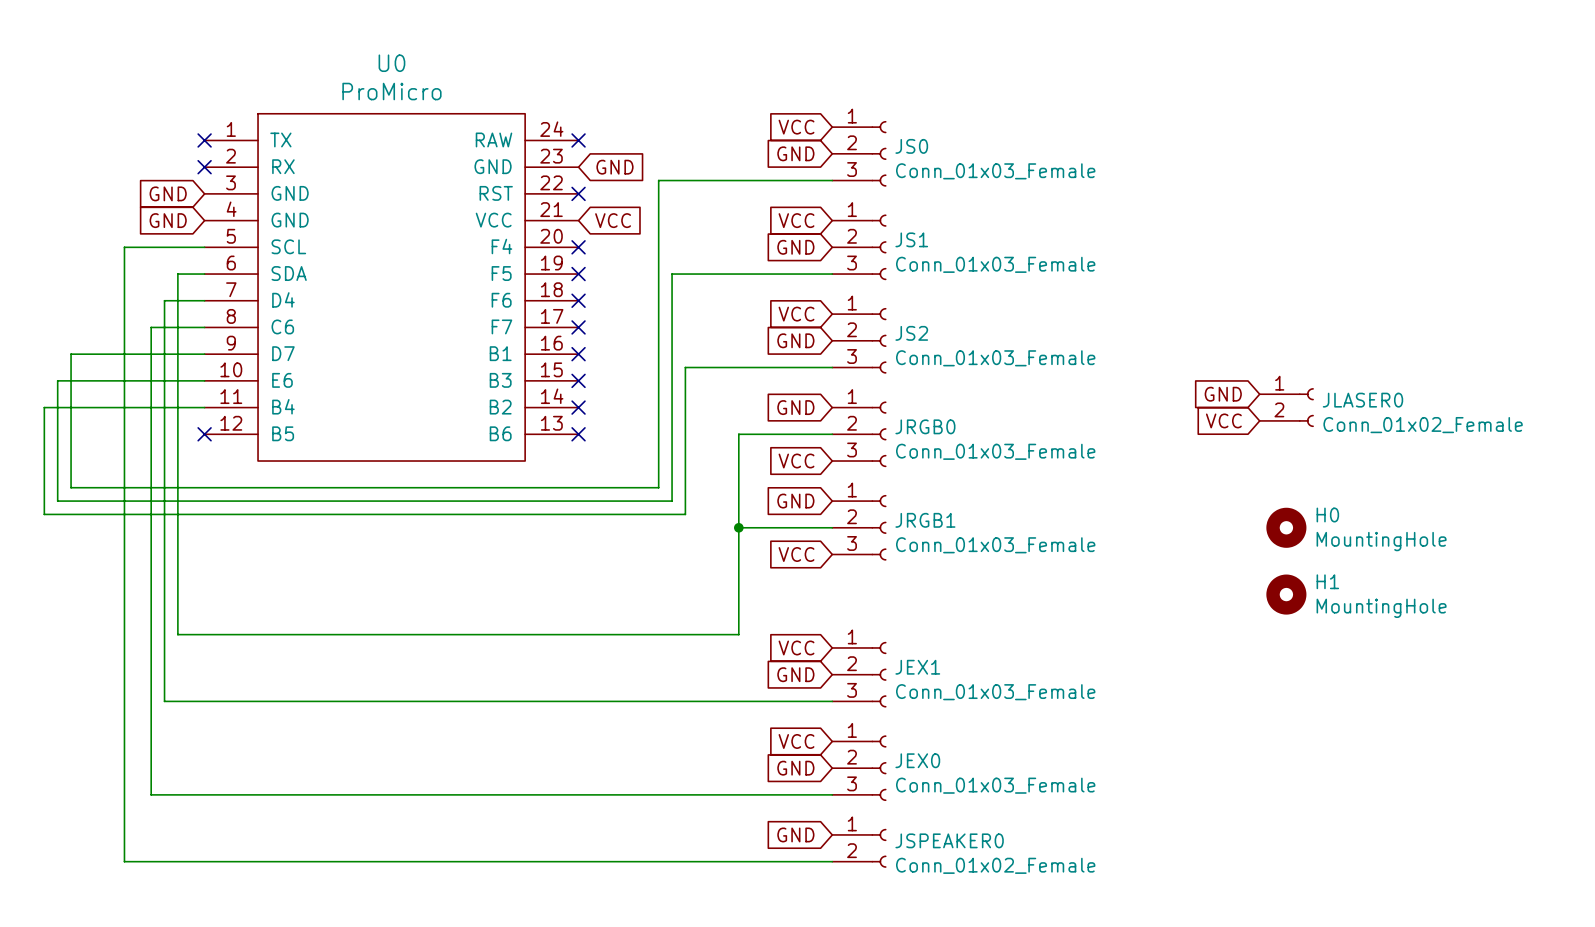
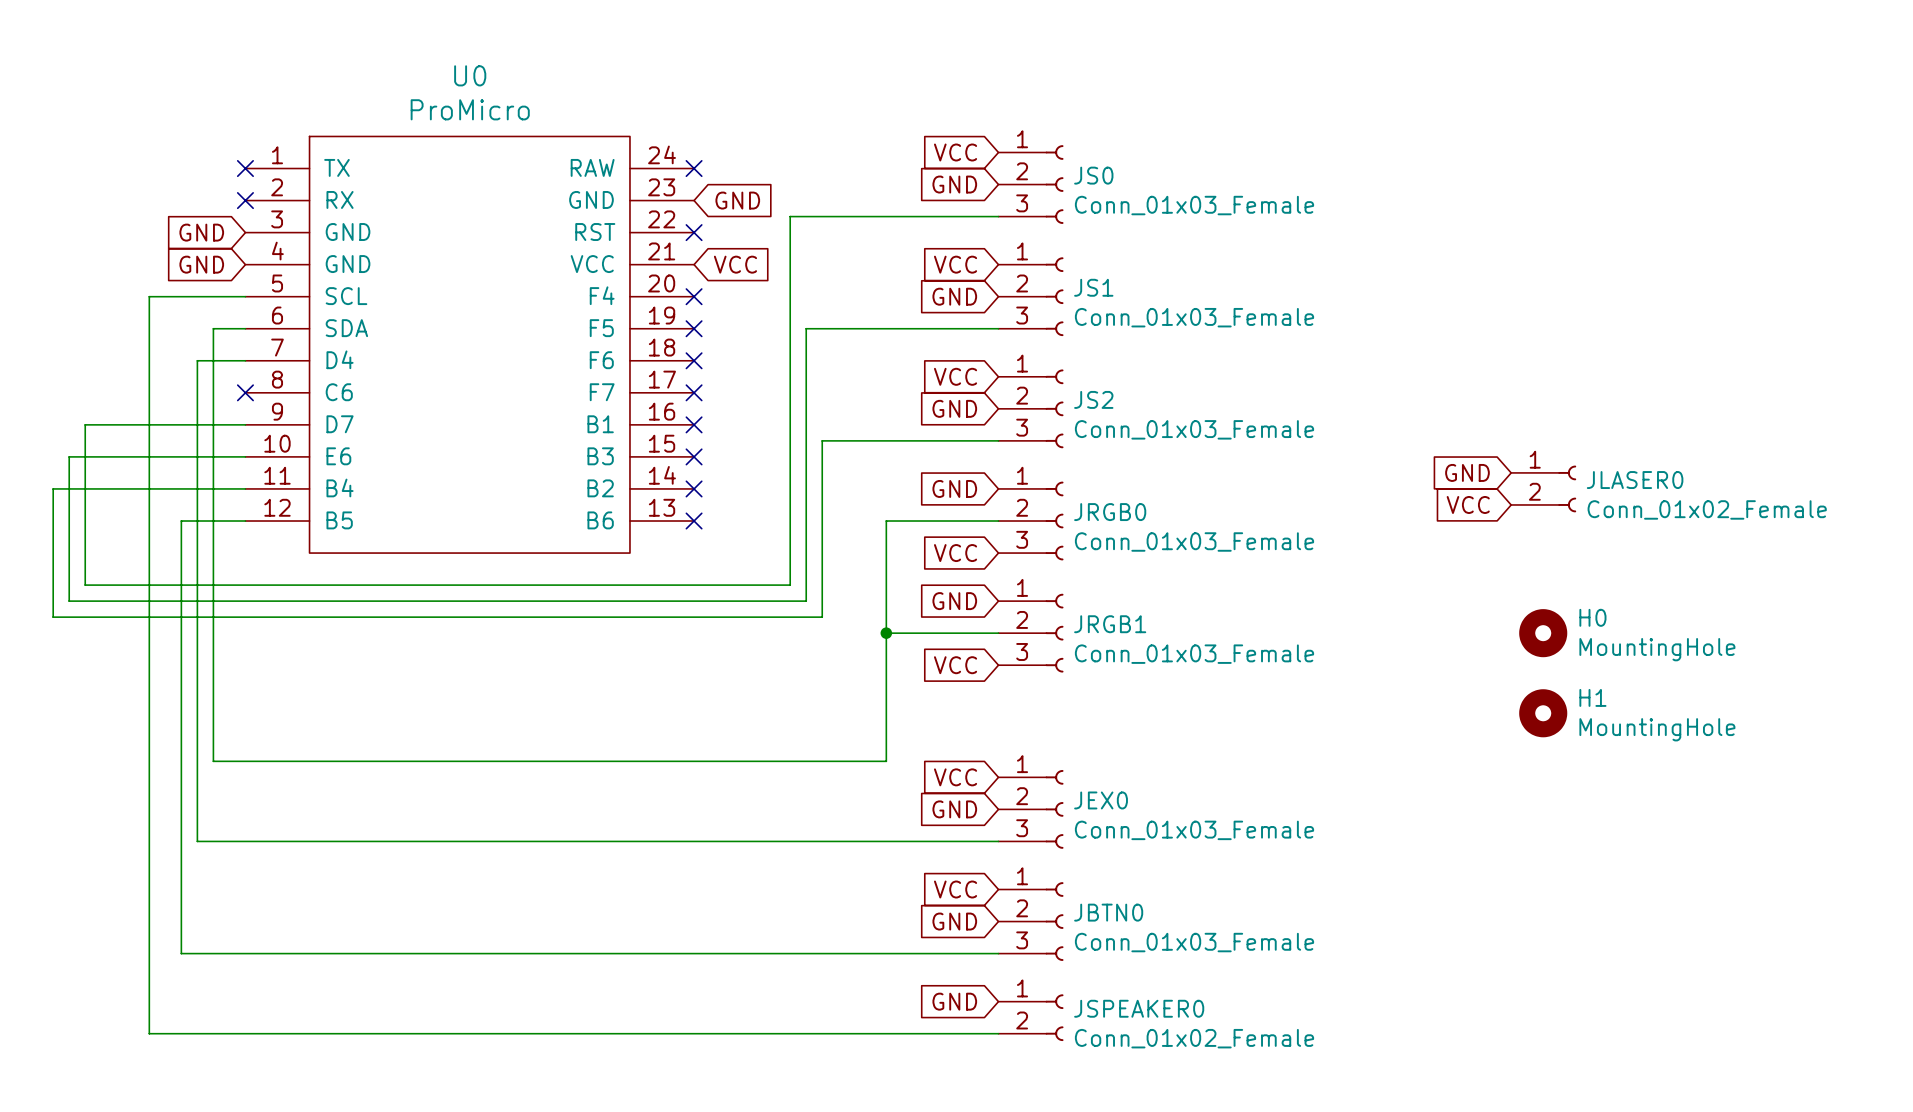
wire: (204, 327) (151, 327) (151, 434) -> (245, 521) (181, 521)
no-connect mark: none -> (245, 392)
no-connect mark: (204, 434) -> none
JEX1 name: JEX1 (917, 667) -> JEX0 (1101, 800)
JEX0 name: JEX0 (917, 760) -> JBTN0 (1108, 912)

